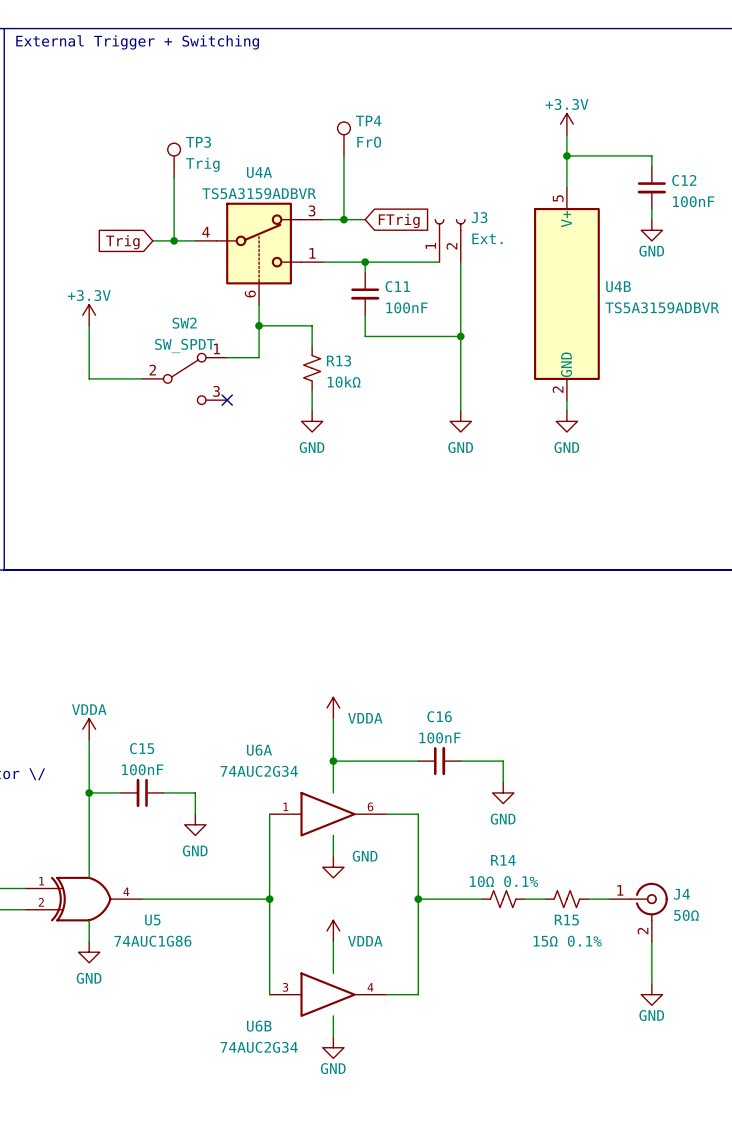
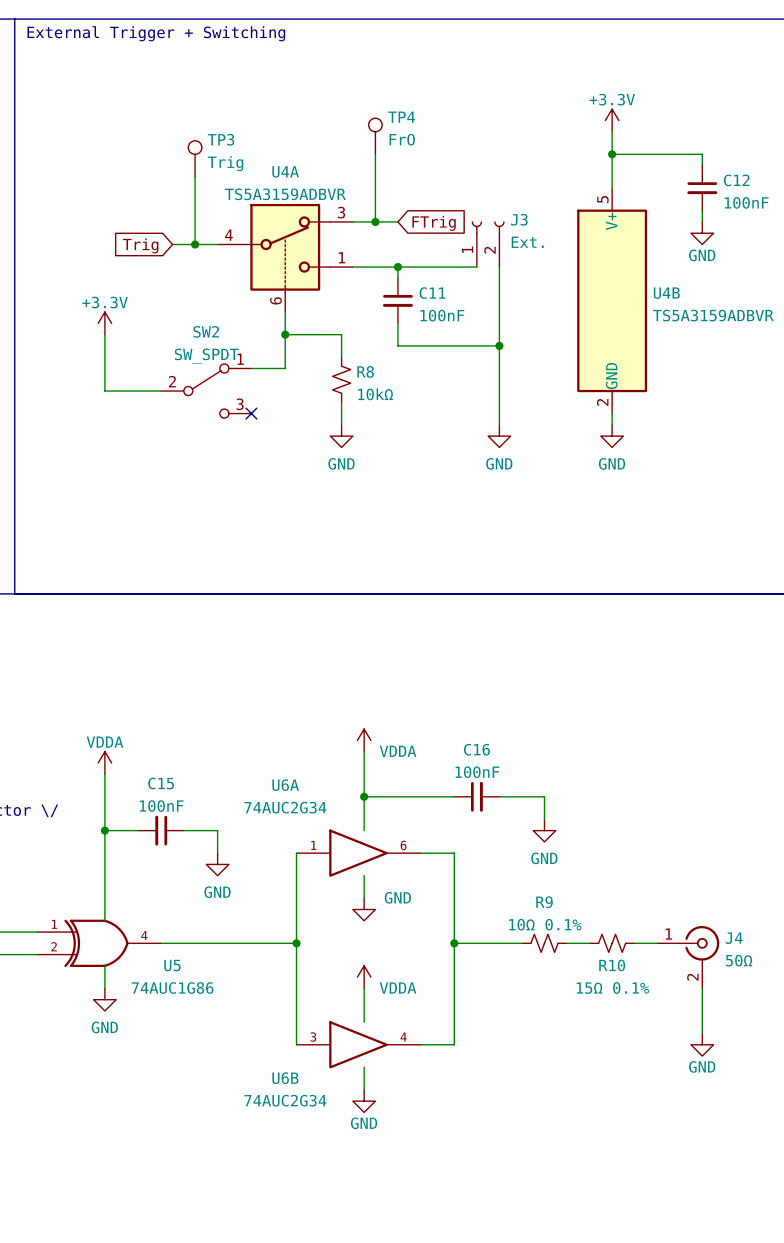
R13 name: R13 (339, 360) -> R8 (365, 371)
R14 name: R14 (503, 860) -> R9 (544, 902)
R15 name: R15 (566, 920) -> R10 (612, 965)

